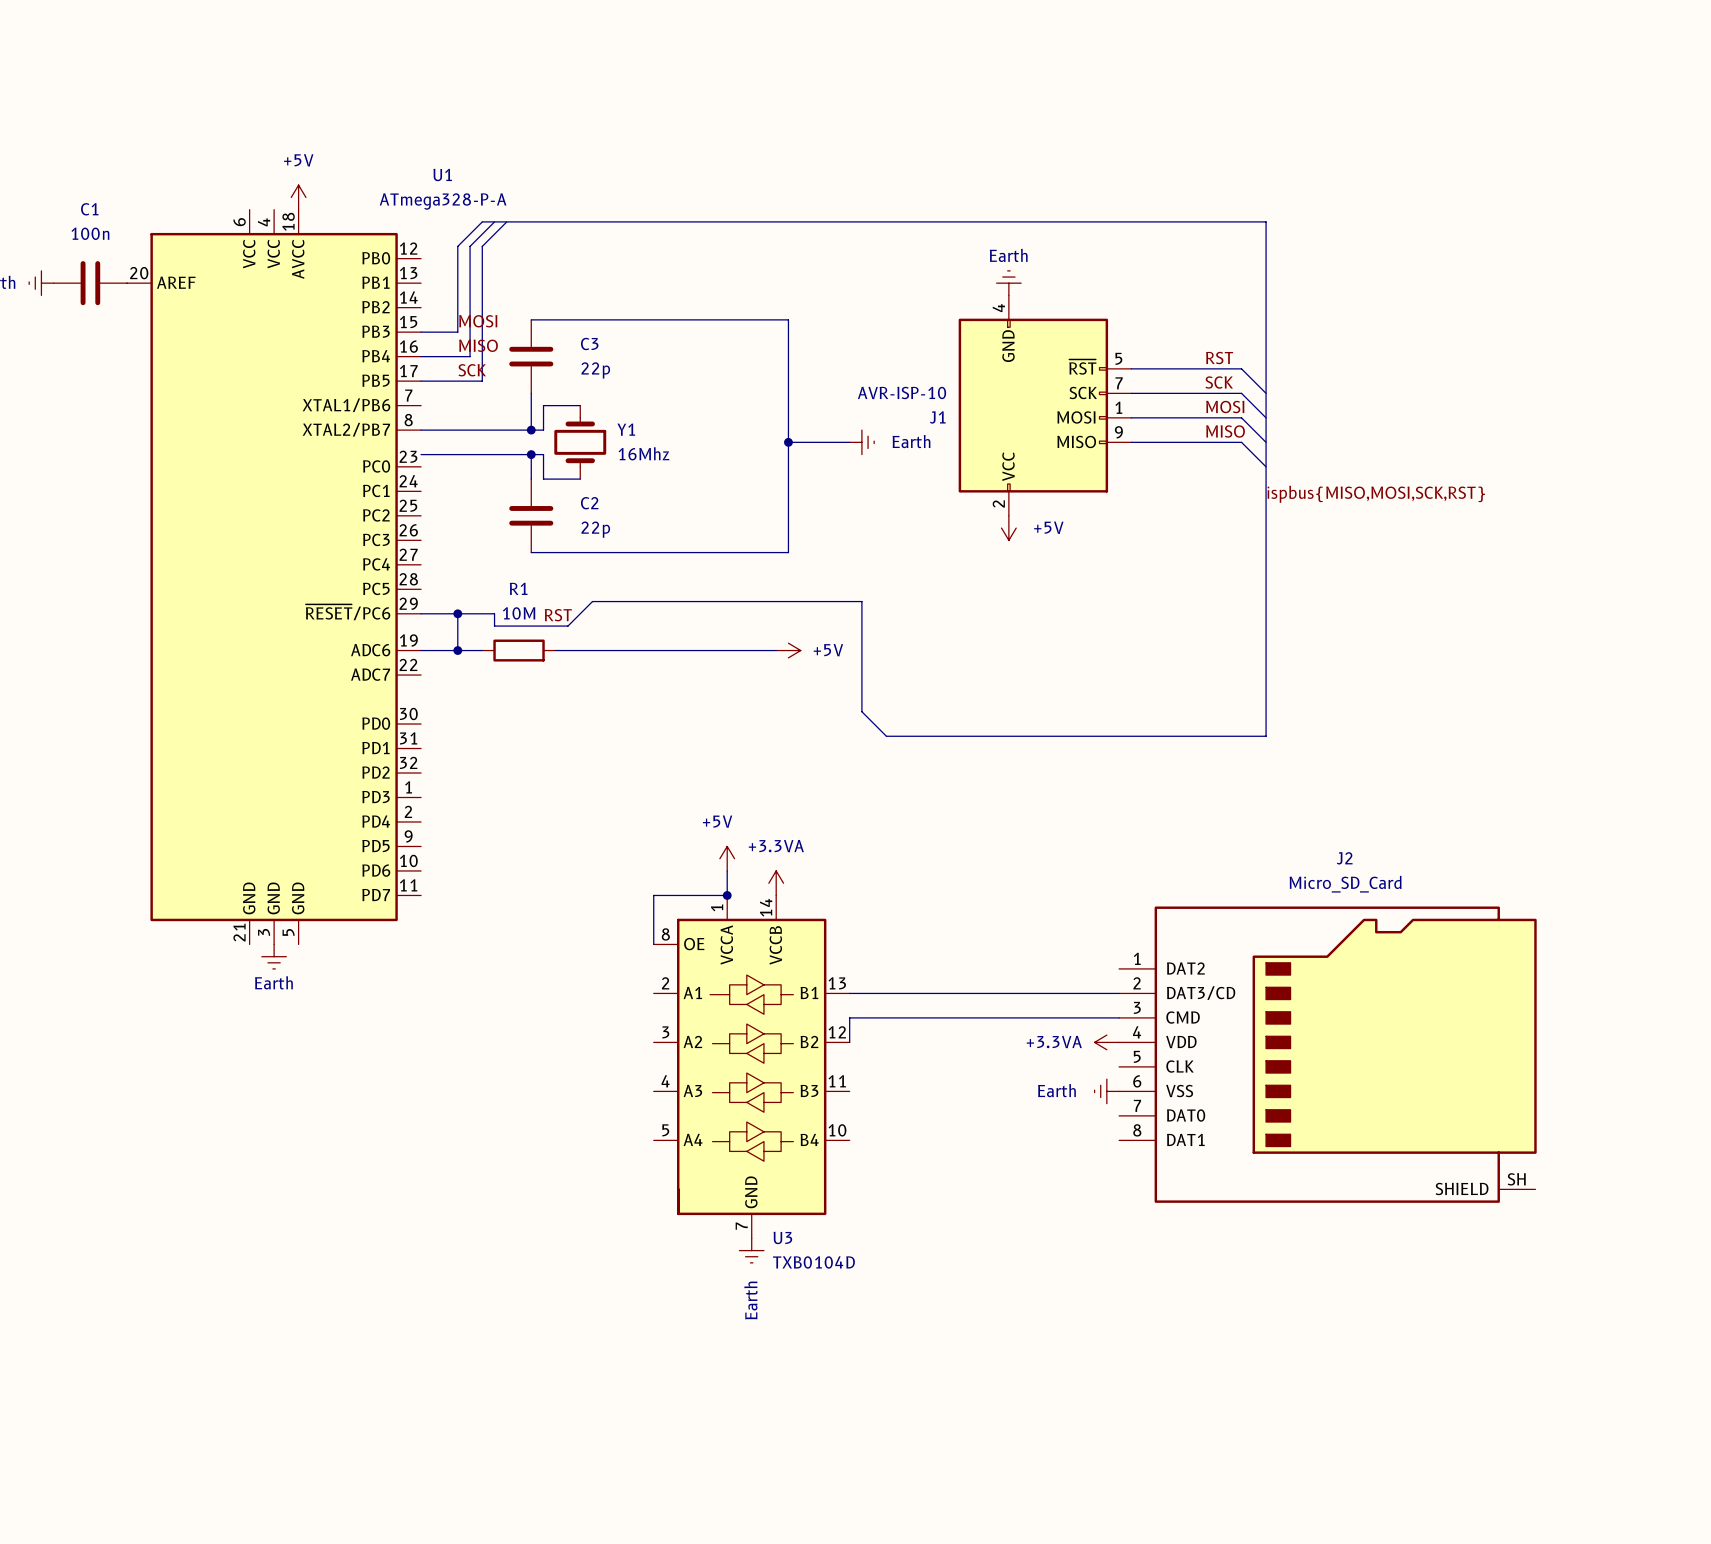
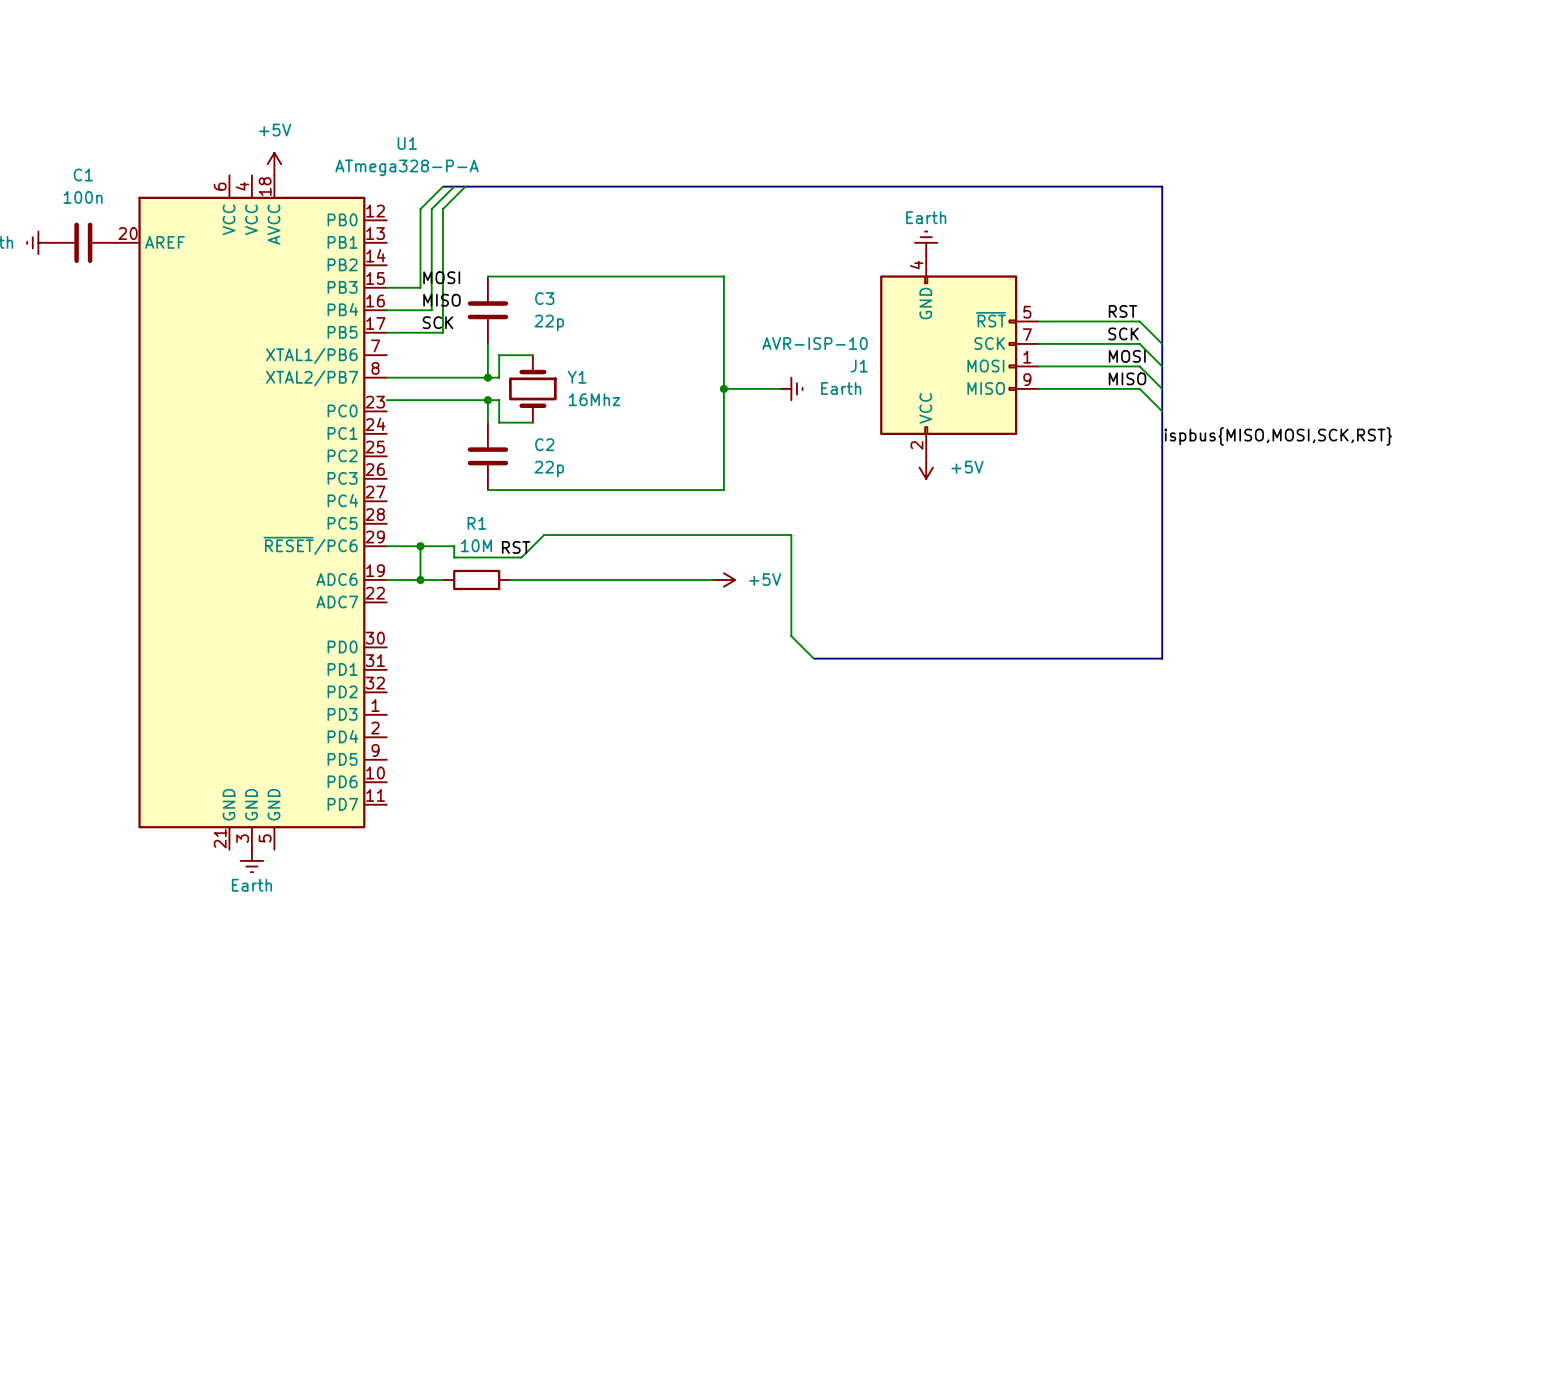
power symbol: +5V (727, 858) -> none
wire: (727, 870) (727, 895) (653, 895) (653, 944) -> none
power symbol: +3.3VA (776, 883) -> none
junction: (727, 895) -> none
wire: (849, 993) (1119, 993) -> none
wire: (1119, 1017) (849, 1017) (849, 1042) -> none
power symbol: +3.3VA (1106, 1042) -> none
J2: Micro_SD_Card (1327, 1054) -> none
U3: TXB0104D (751, 1066) -> none
power symbol: Earth (1106, 1091) -> none
power symbol: Earth (751, 1250) -> none

